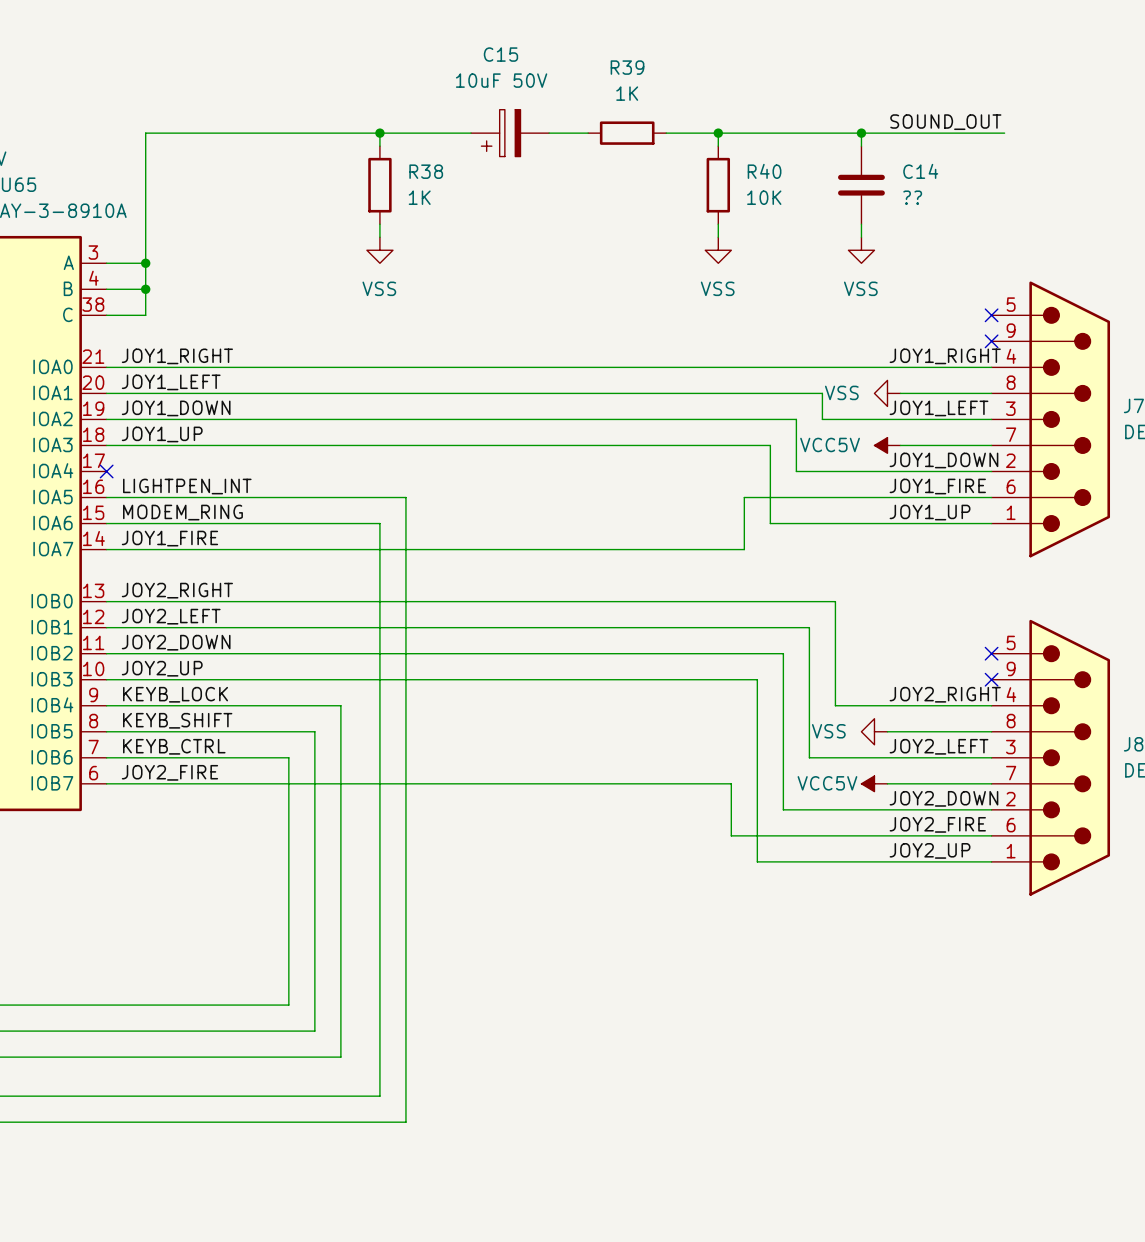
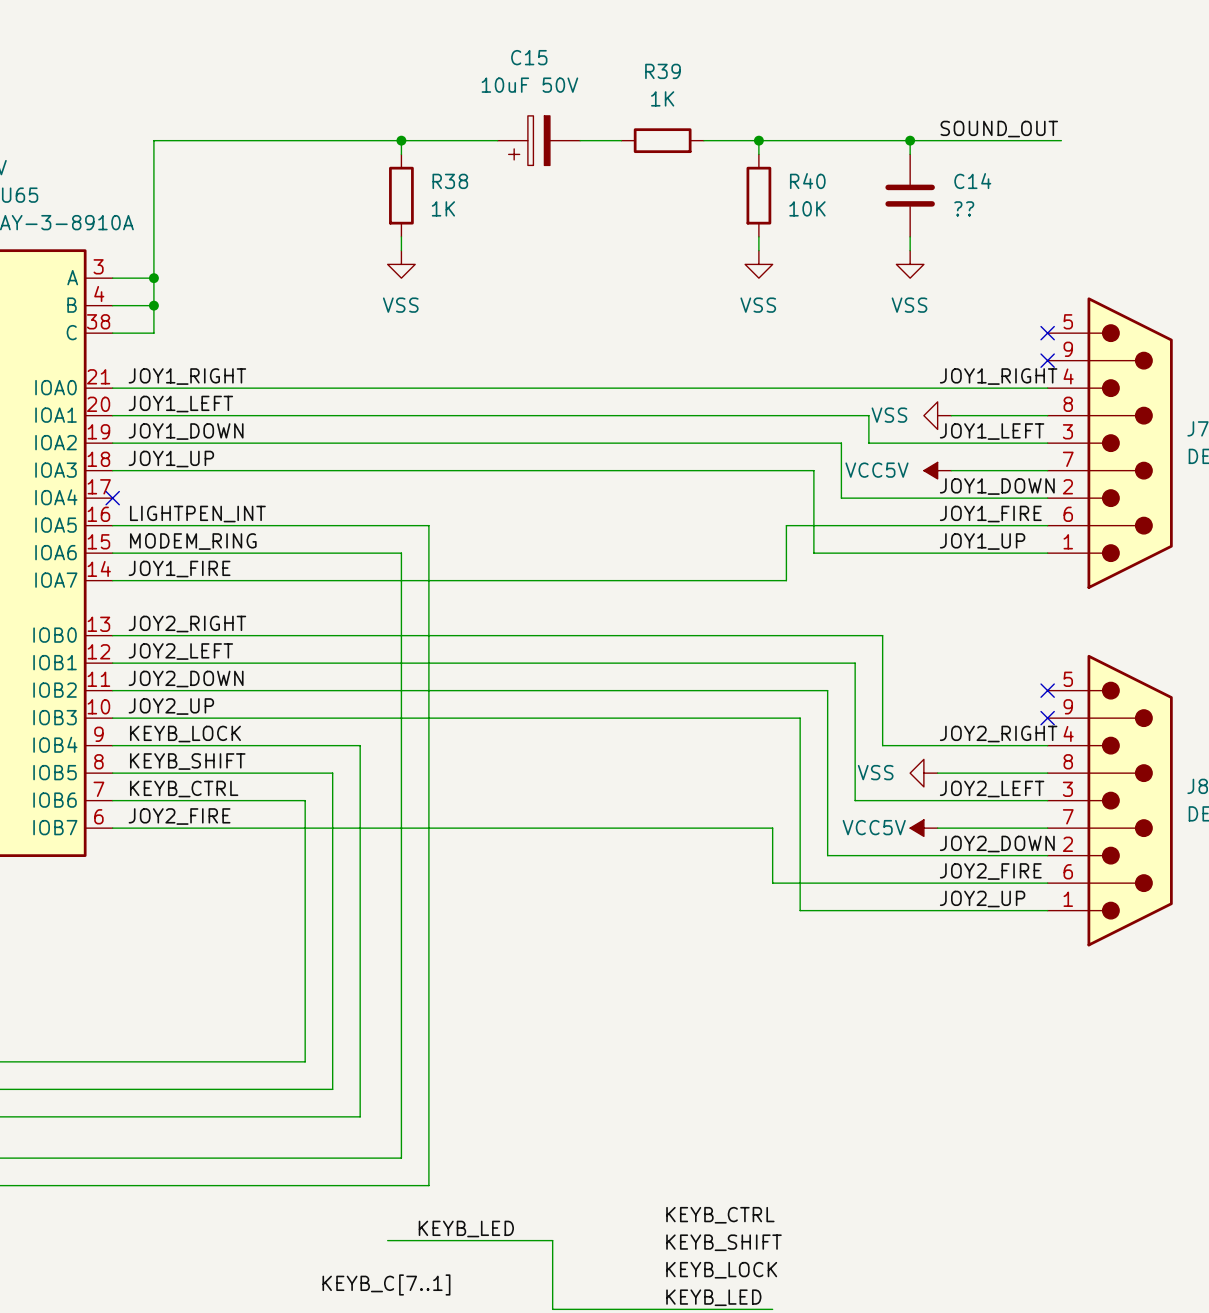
label: none -> KEYB_CTRL (720, 1215)
label: none -> KEYB_LED (466, 1228)
wire: none -> (387, 1240) (552, 1240) (552, 1309) (772, 1309)
label: none -> KEYB_SHIFT (723, 1242)
label: none -> KEYB_LOCK (721, 1270)
label: none -> KEYB_C[7..1] (386, 1284)
label: none -> KEYB_LED (713, 1297)

